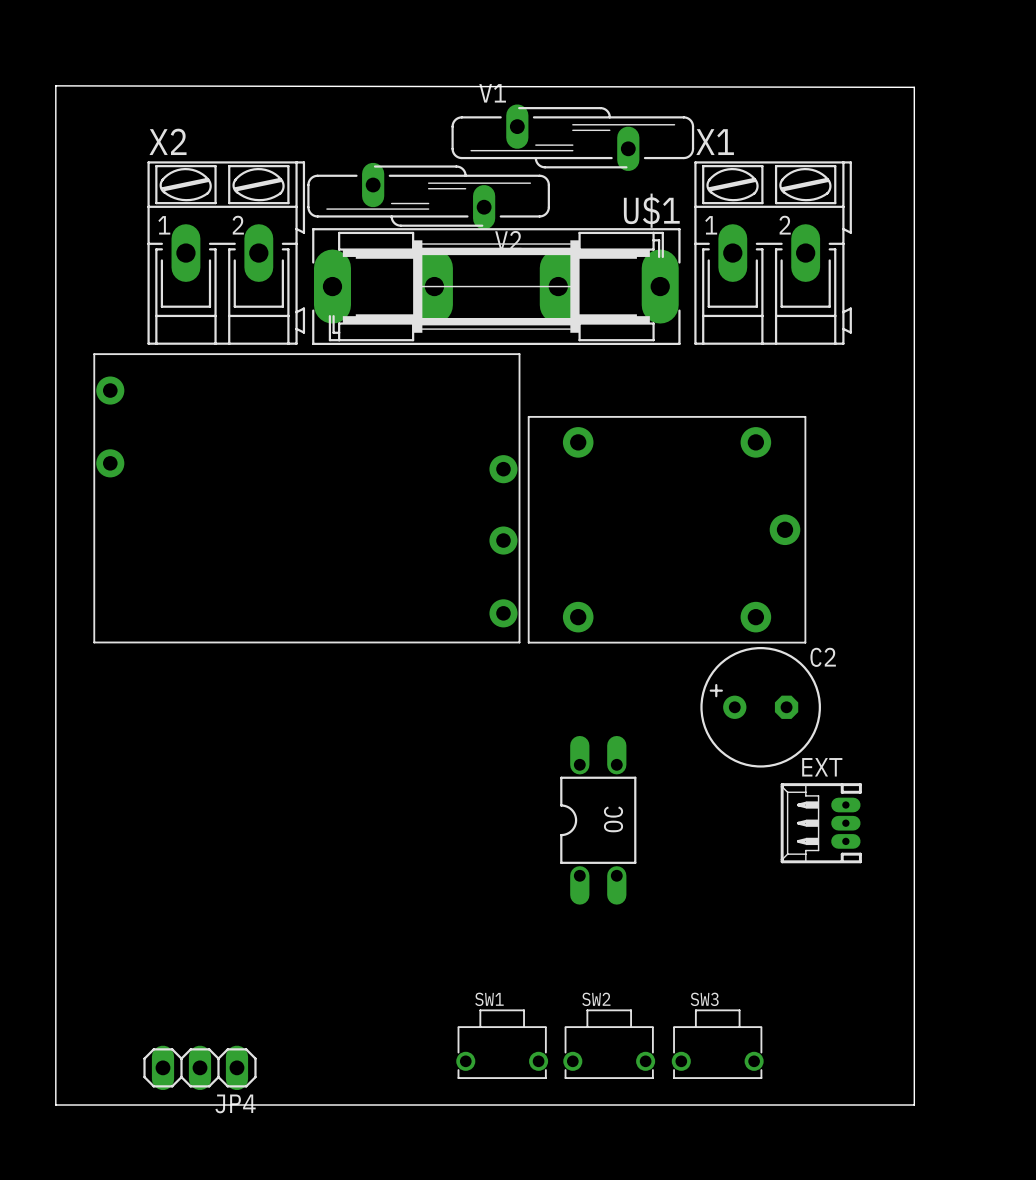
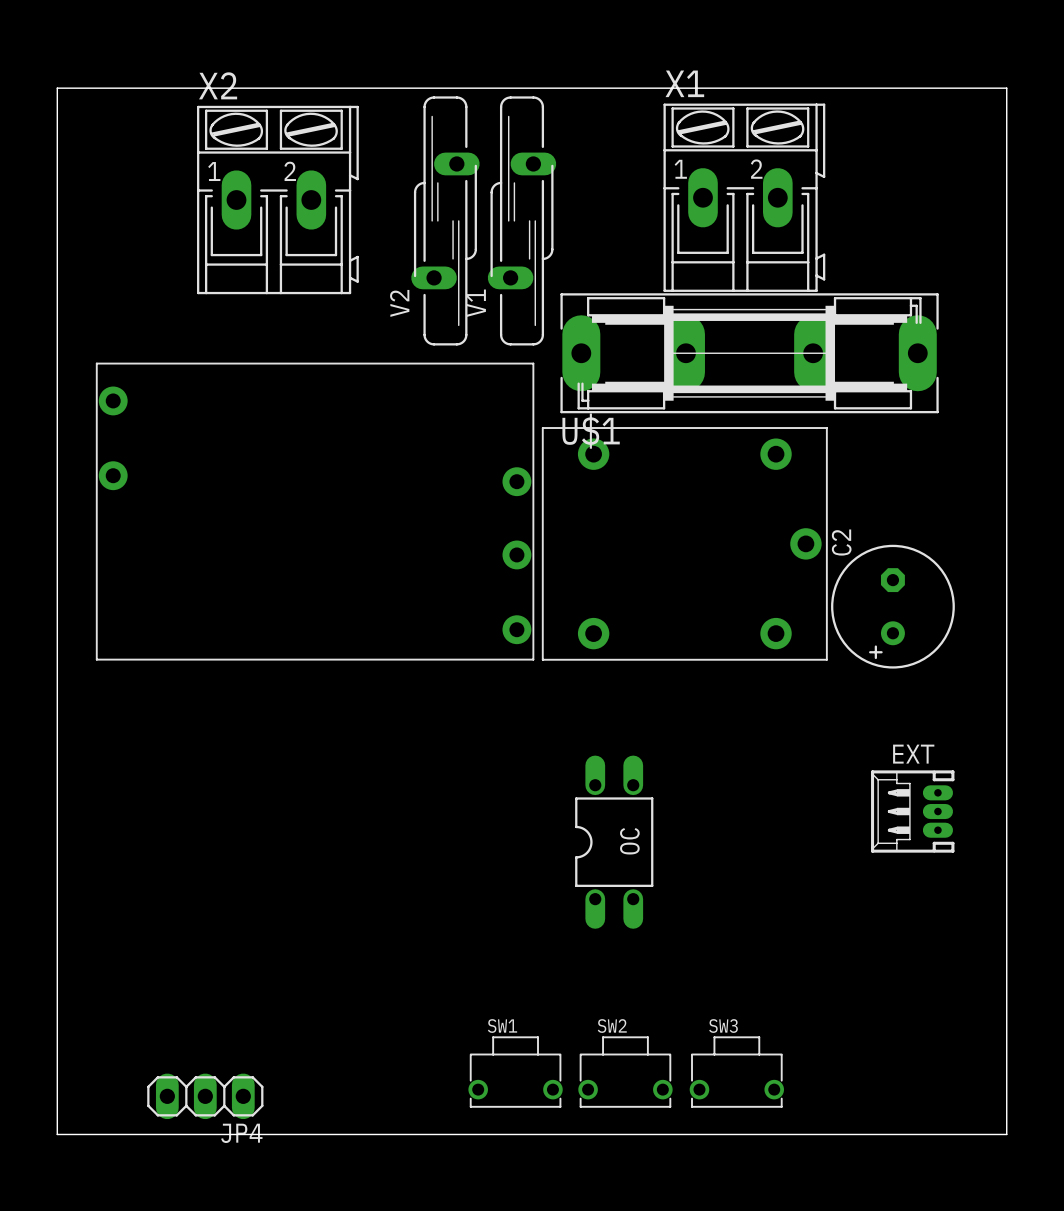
board edge: (55, 85) (914, 87) (914, 1105) -> (57, 88) (1006, 88) (1006, 1134) (938, 1134)
V1 name position: V1 (492, 93) -> V1 (476, 303)
V1 rotation: 0° (572, 137) -> 90° clockwise (522, 220)
V2 rotation: 0° (428, 196) -> 90° clockwise (445, 220)
U$1 name position: U$1 (651, 210) -> U$1 (591, 431)
X2 position: (226, 253) -> (277, 200)
X1 position: (773, 253) -> (744, 197)
U$1 position: (496, 286) -> (749, 353)
C2 rotation: 0° (760, 707) -> 90° counterclockwise (892, 606)
C2 position: (760, 707) -> (892, 606)
EXT position: (821, 823) -> (912, 811)

